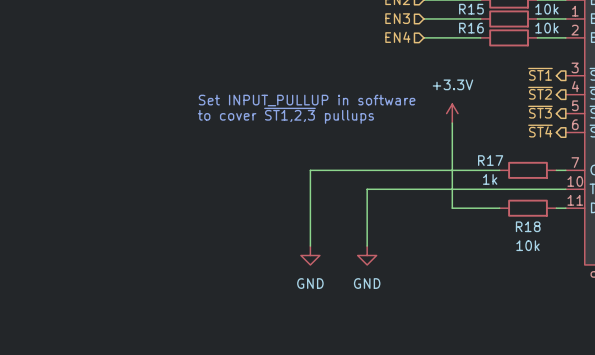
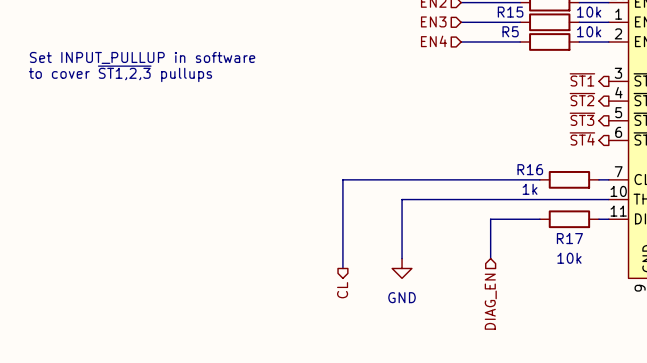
R16 name: R16 (471, 28) -> R5 (510, 31)
text: none -> Set INPUT_PULLUP in software (142, 57)
text: none -> to cover ~{ST1,2,3} pullups (120, 73)
text: Set INPUT_PULLUP in software (307, 100) -> none
power symbol: +3.3V (452, 113) -> none
text: to cover ~{ST1,2,3} pullups (285, 115) -> none
wire: (452, 123) (452, 208) -> (490, 258) (490, 219)
R17 name: R17 (490, 160) -> R16 (530, 169)
R18 name: R18 (528, 226) -> R17 (569, 238)
power symbol: GND (310, 255) -> none
hierarchical label: none -> CL (342, 290)
hierarchical label: none -> DIAG_EN (490, 301)

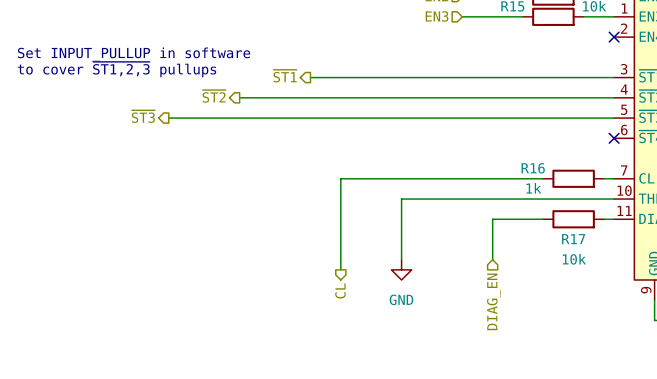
hierarchical label: EN4 (433, 41) -> none
wire: (461, 41) (520, 41) -> none
R5: 10k (549, 41) -> none
wire: (579, 41) (608, 41) -> none
no-connect mark: none -> (614, 37)
hierarchical label: none -> ~{ST1} (285, 76)
hierarchical label: ~{ST1} (582, 79) -> none
wire: none -> (310, 77) (614, 77)
hierarchical label: none -> ~{ST2} (214, 96)
hierarchical label: ~{ST2} (582, 99) -> none
wire: none -> (239, 97) (614, 97)
hierarchical label: none -> ~{ST3} (143, 116)
hierarchical label: ~{ST3} (582, 119) -> none
wire: none -> (168, 118) (614, 118)
hierarchical label: ~{ST4} (582, 138) -> none
no-connect mark: none -> (614, 138)

